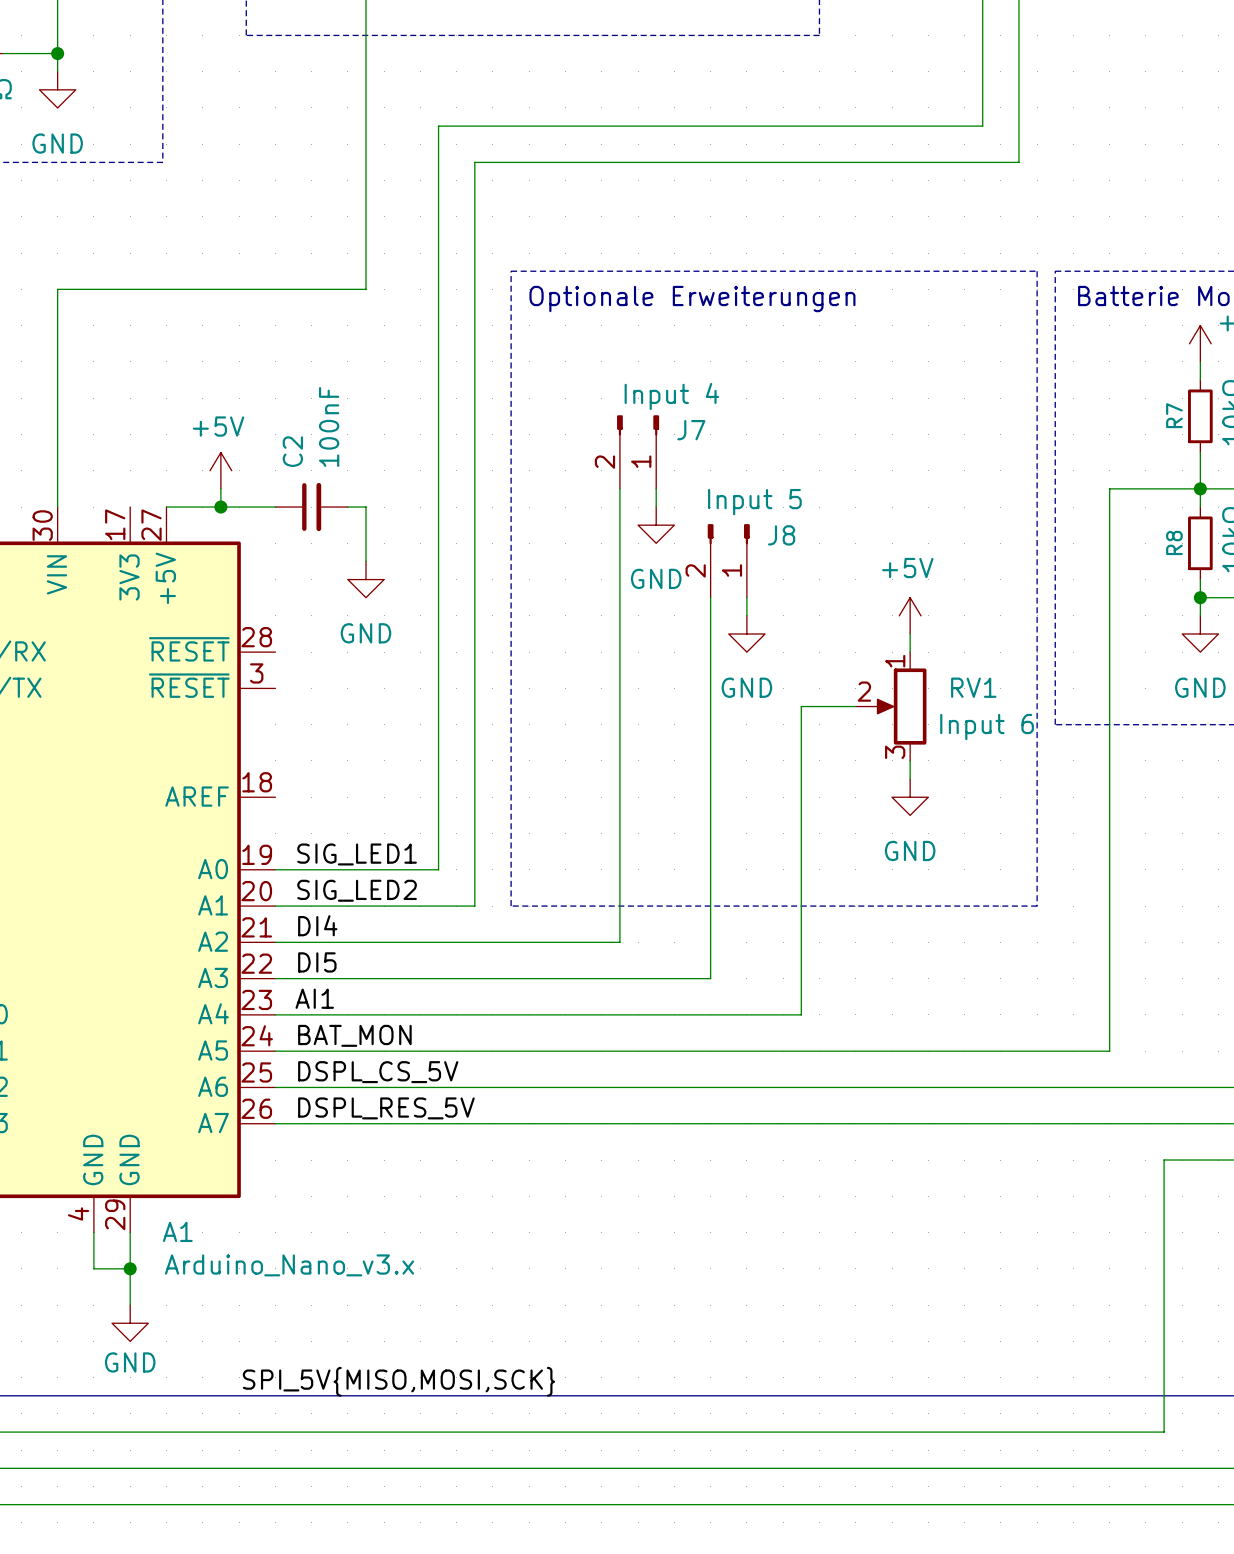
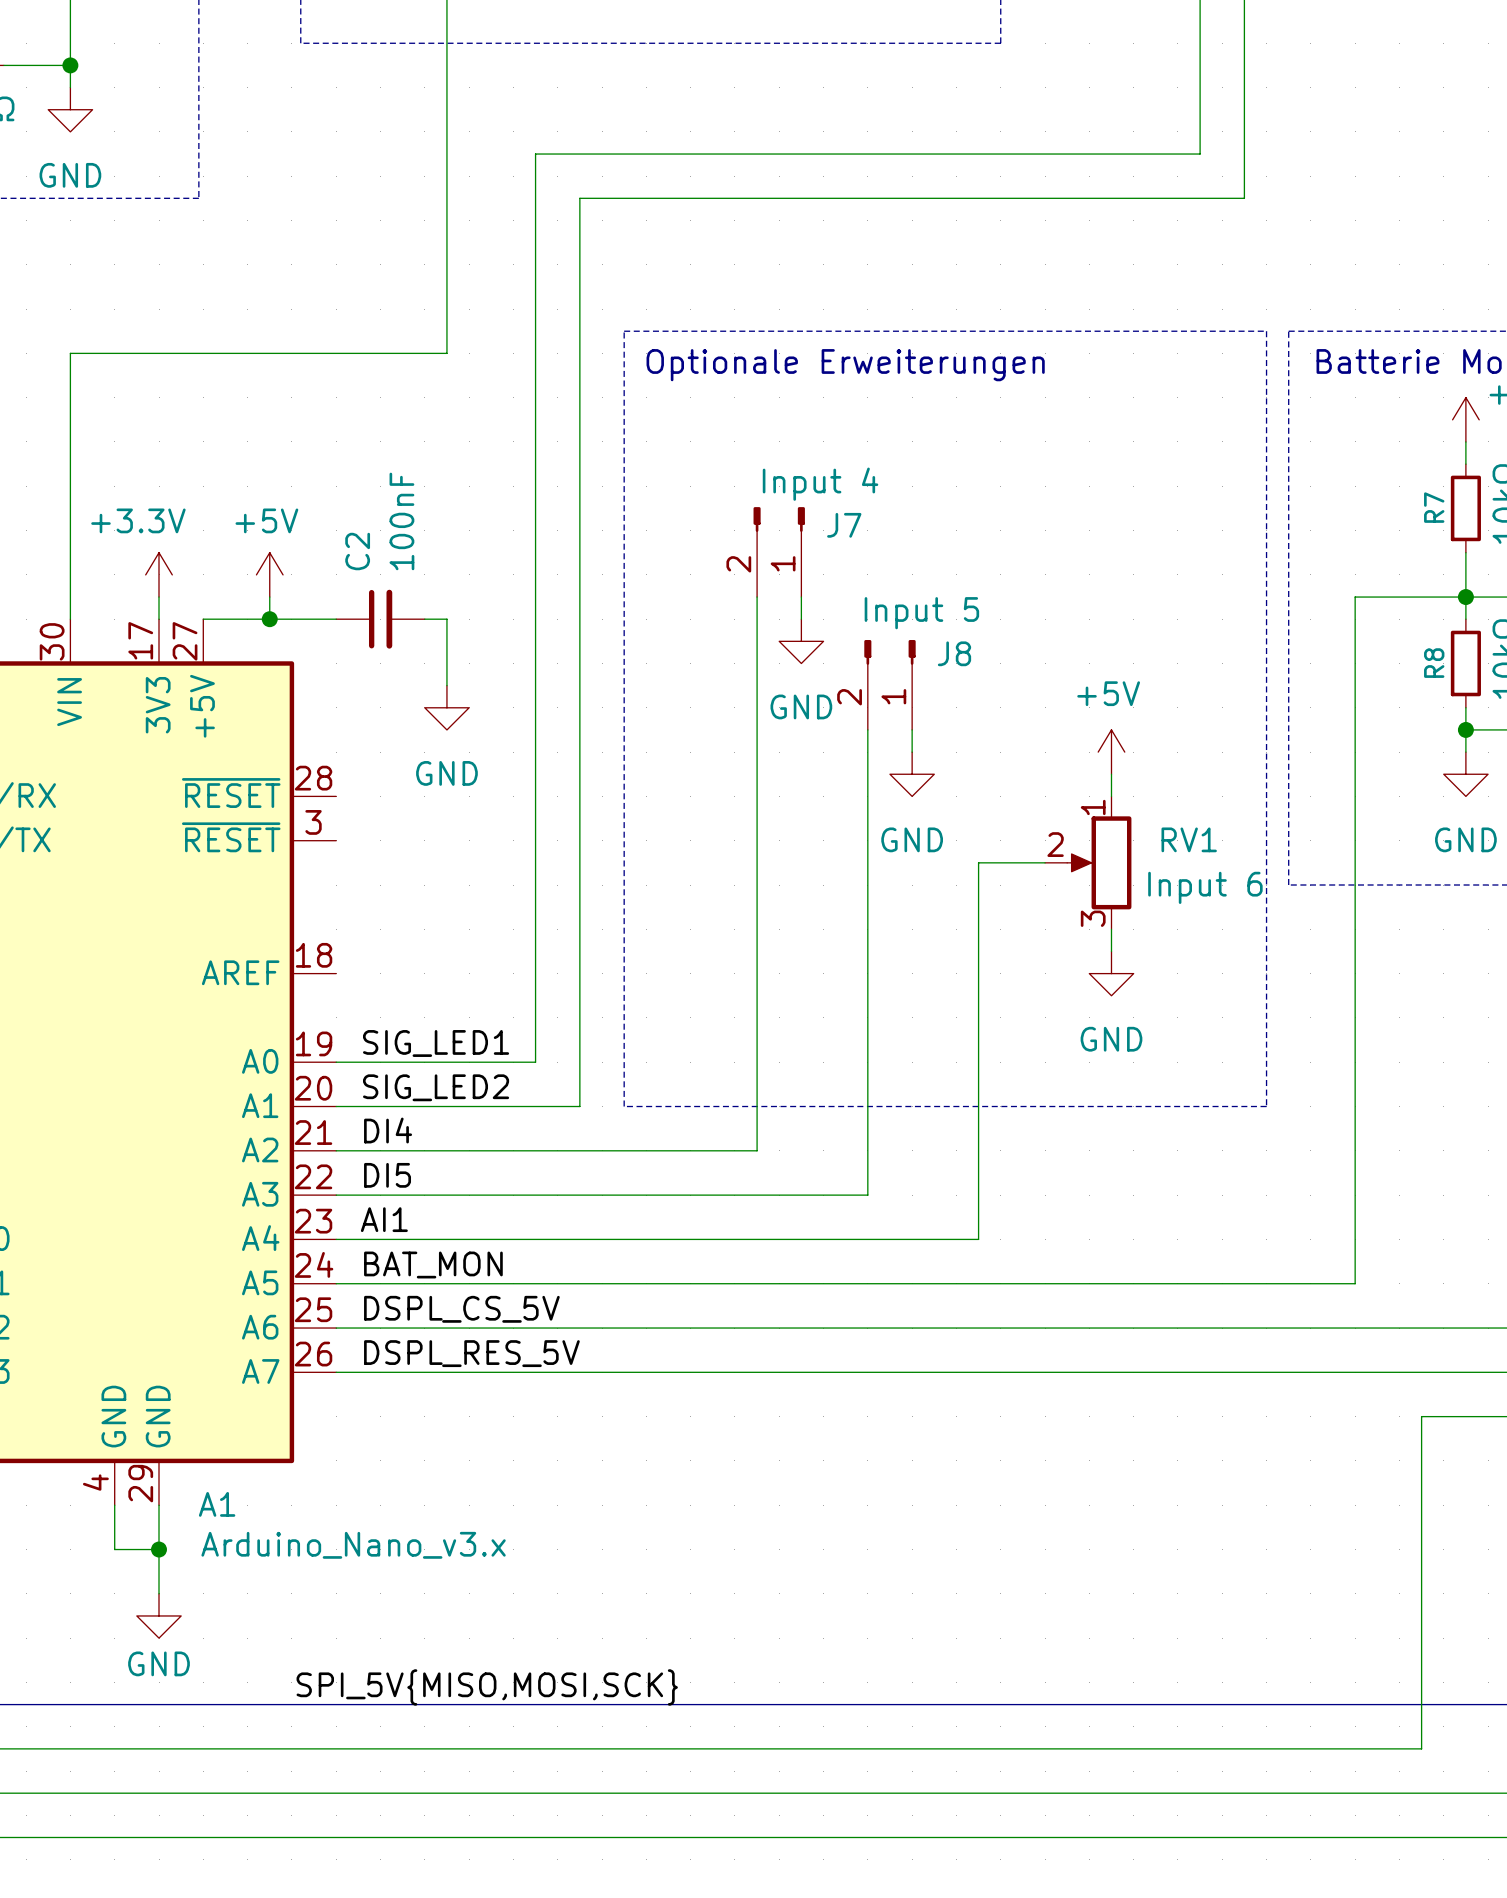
power symbol: none -> +3.3V (159, 574)
wire: none -> (159, 597) (159, 619)

